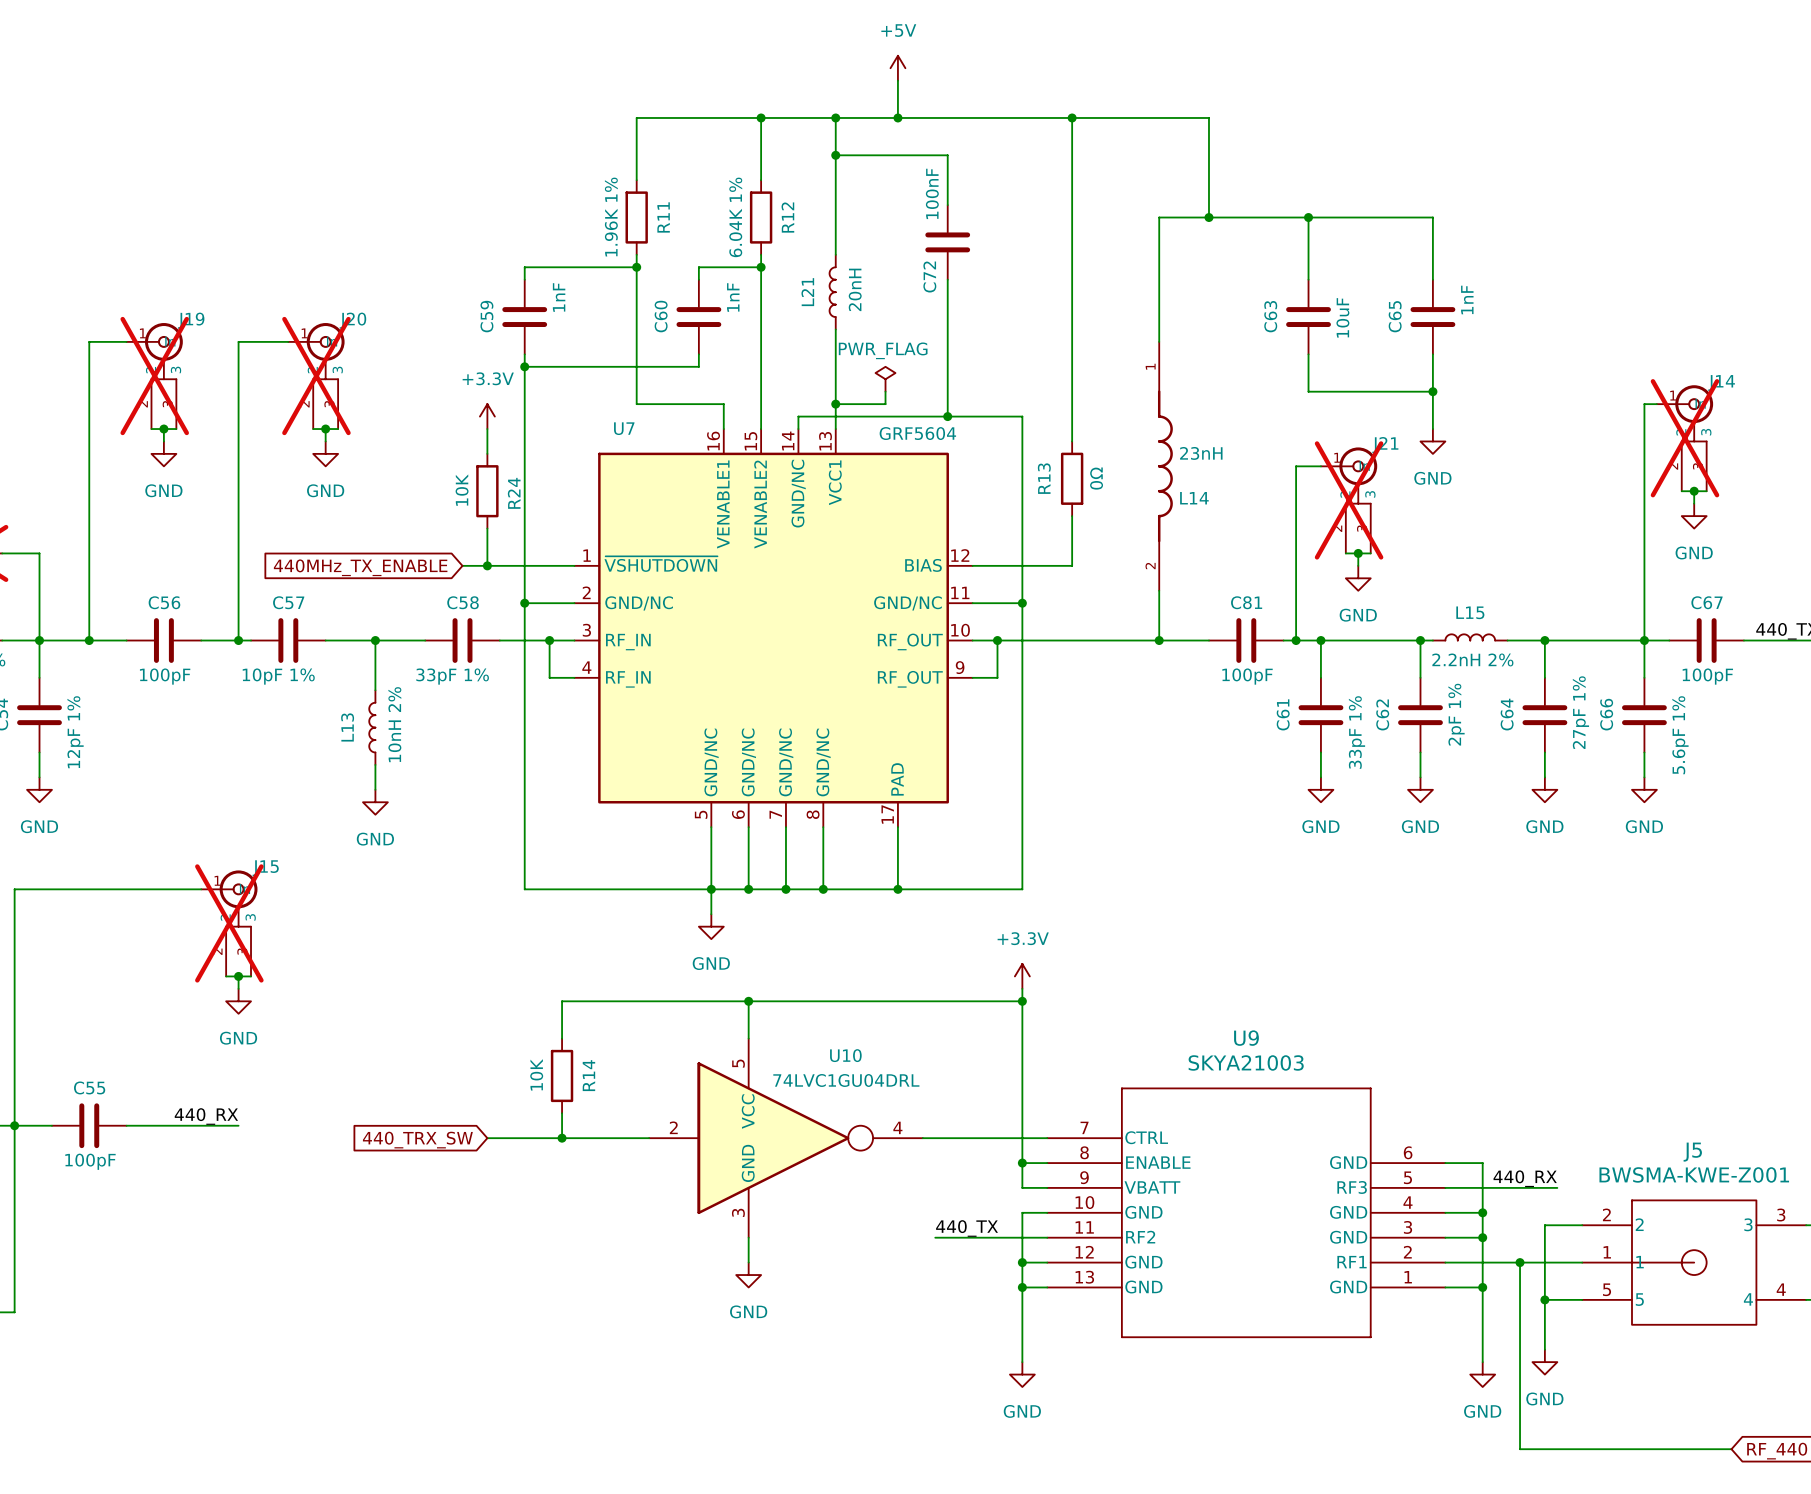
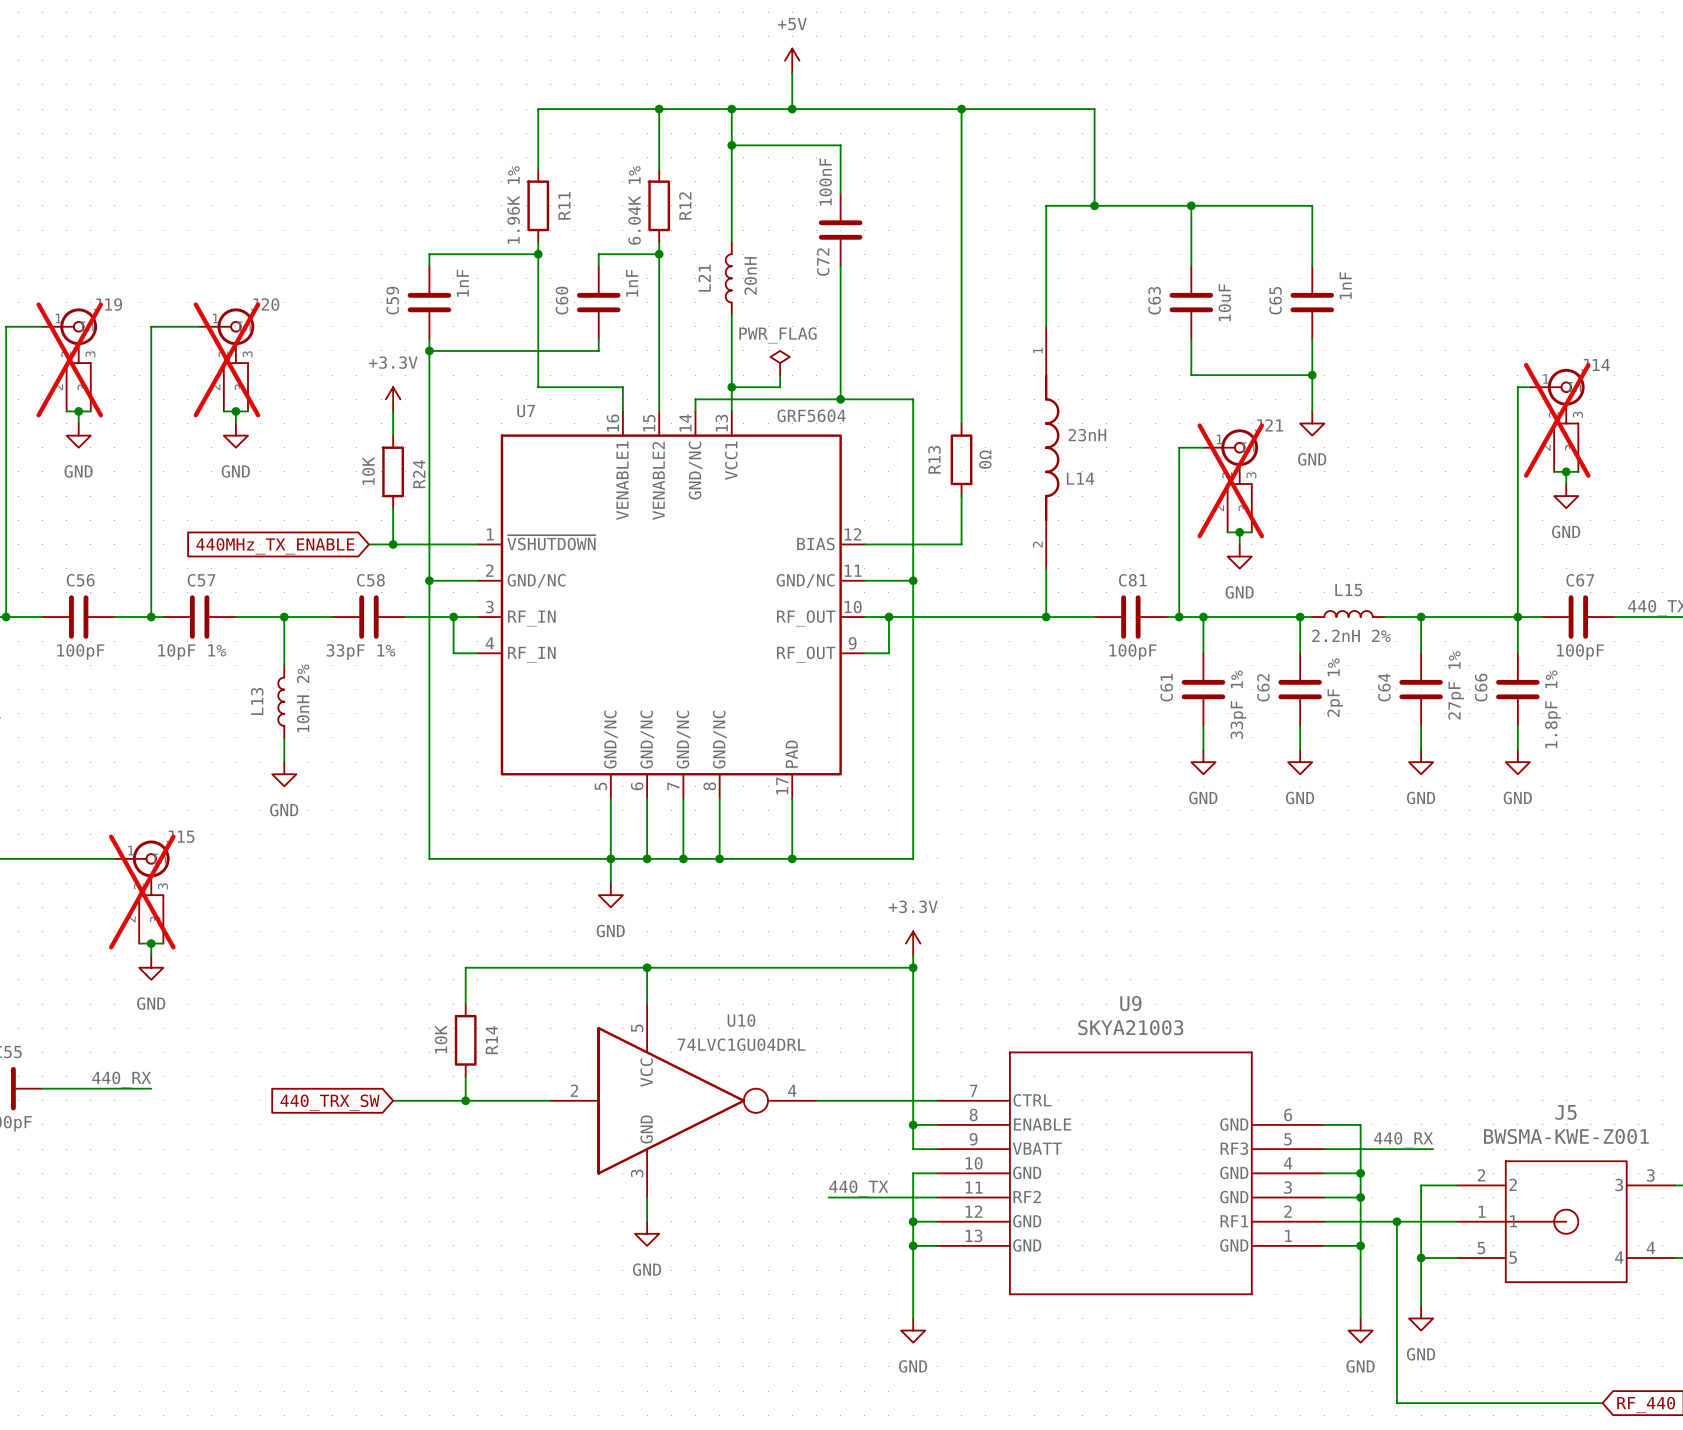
C66 value: 5.6pF 1% (1680, 735) -> 1.8pF 1% (1552, 709)

